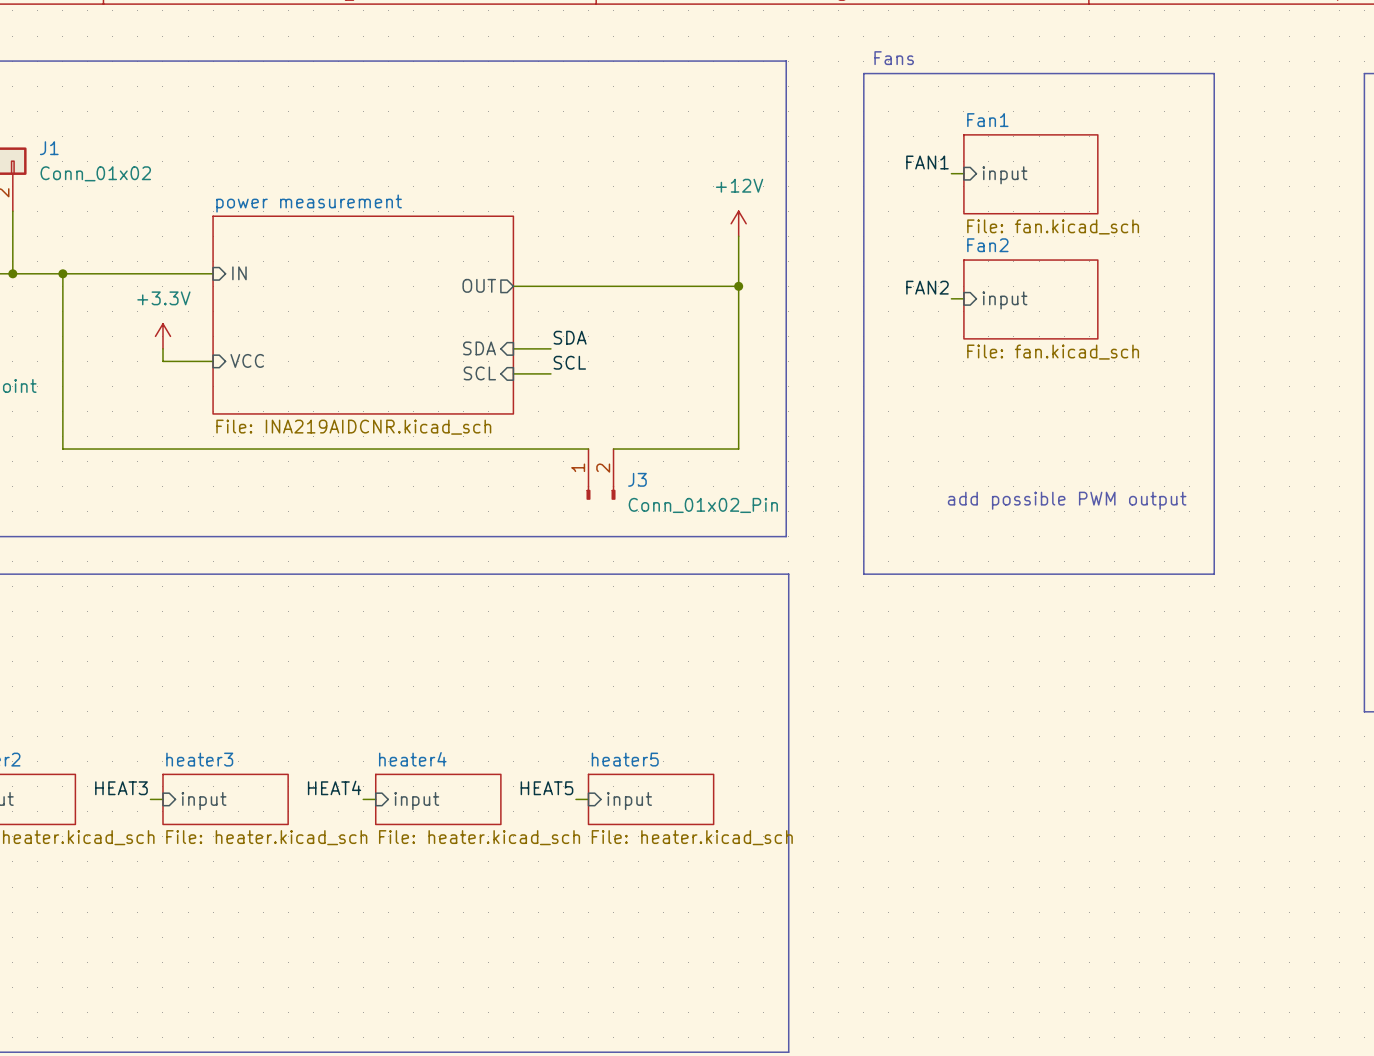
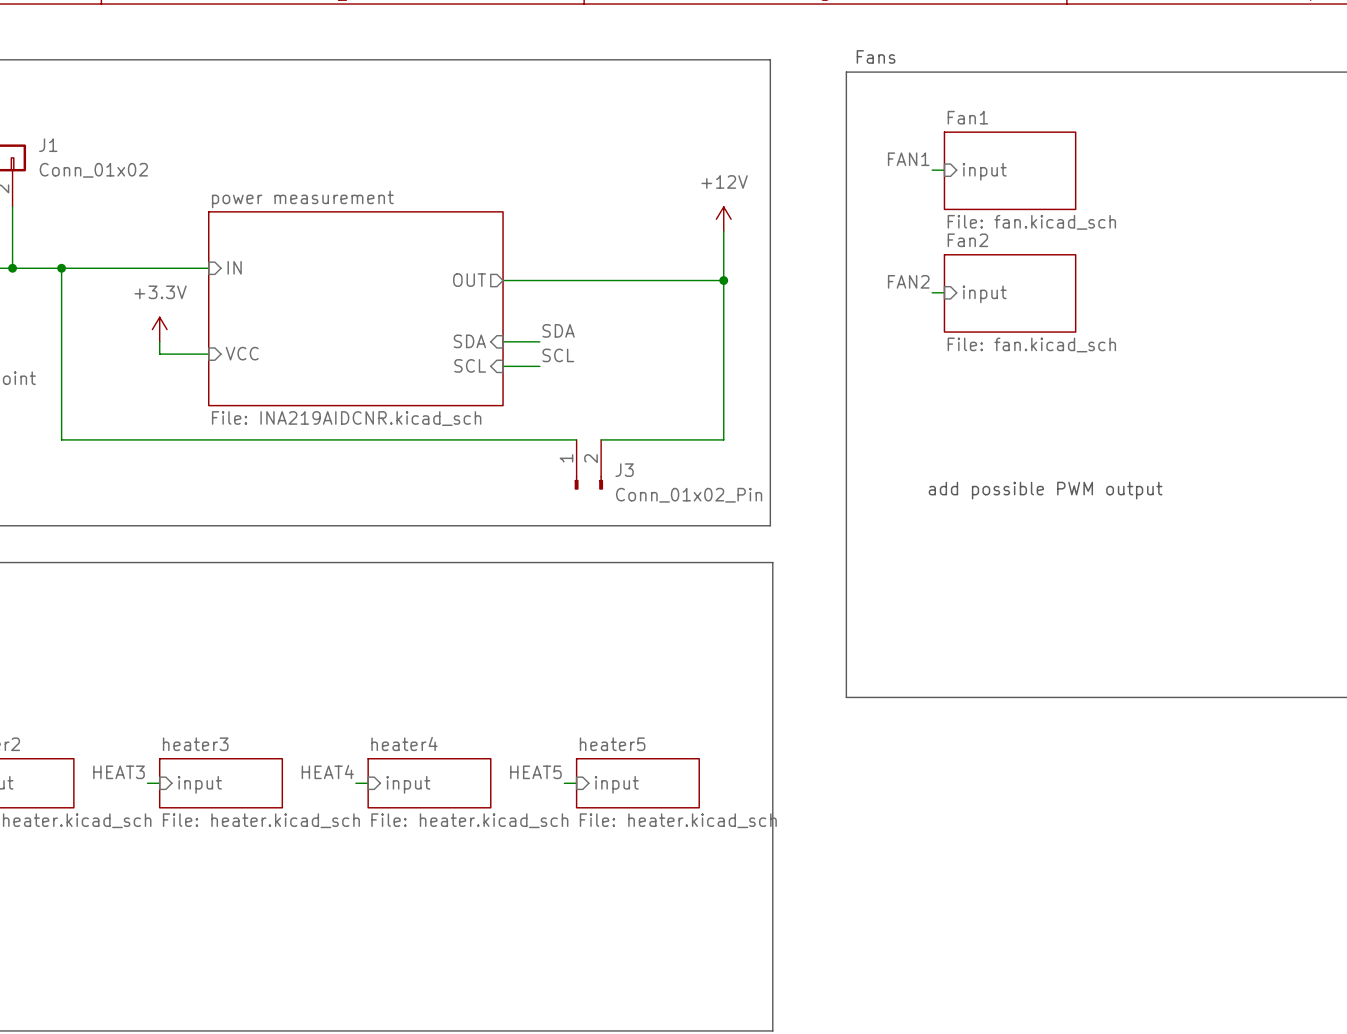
line: (1214, 73) (1214, 574) (863, 574) -> (1336, 697) (846, 697) (846, 562)
line: (1364, 73) (1364, 711) -> (1336, 72) (1189, 72)

